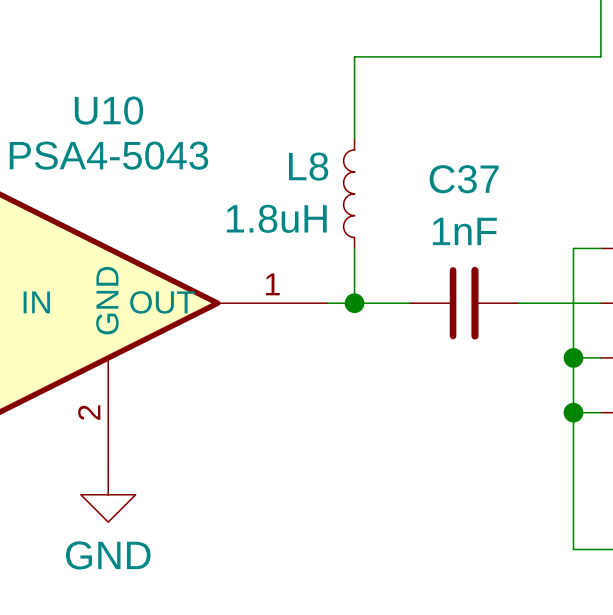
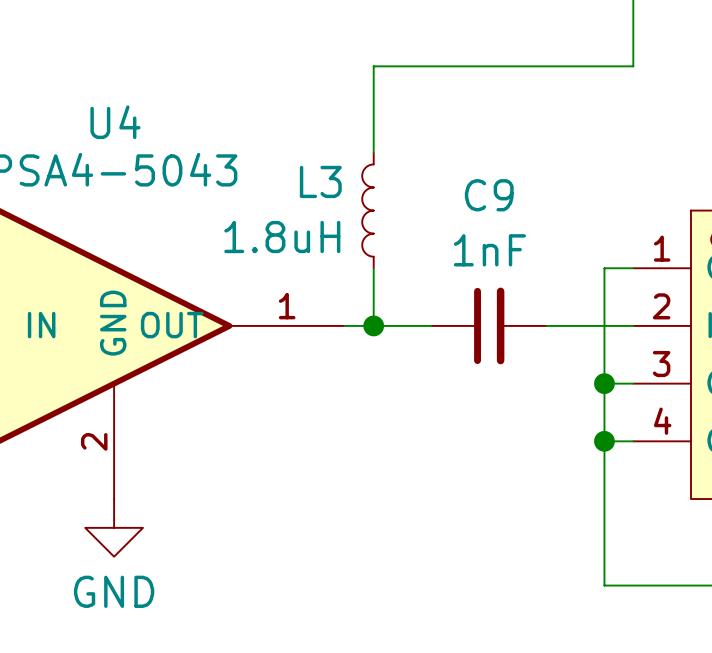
U10 name: U10 (109, 110) -> U4 (115, 122)
L8 name: L8 (308, 166) -> L3 (320, 181)
C37 name: C37 (464, 179) -> C9 (489, 195)

